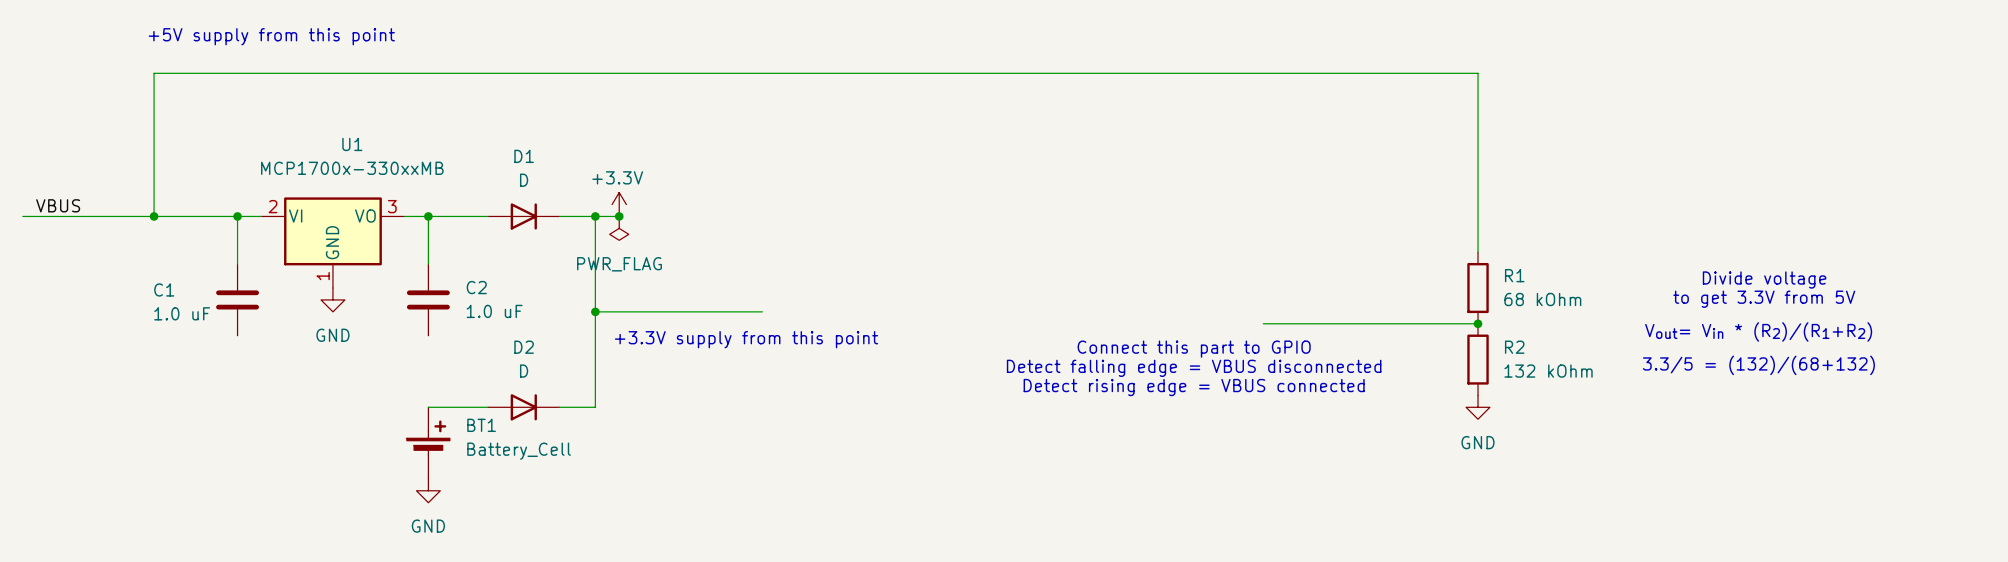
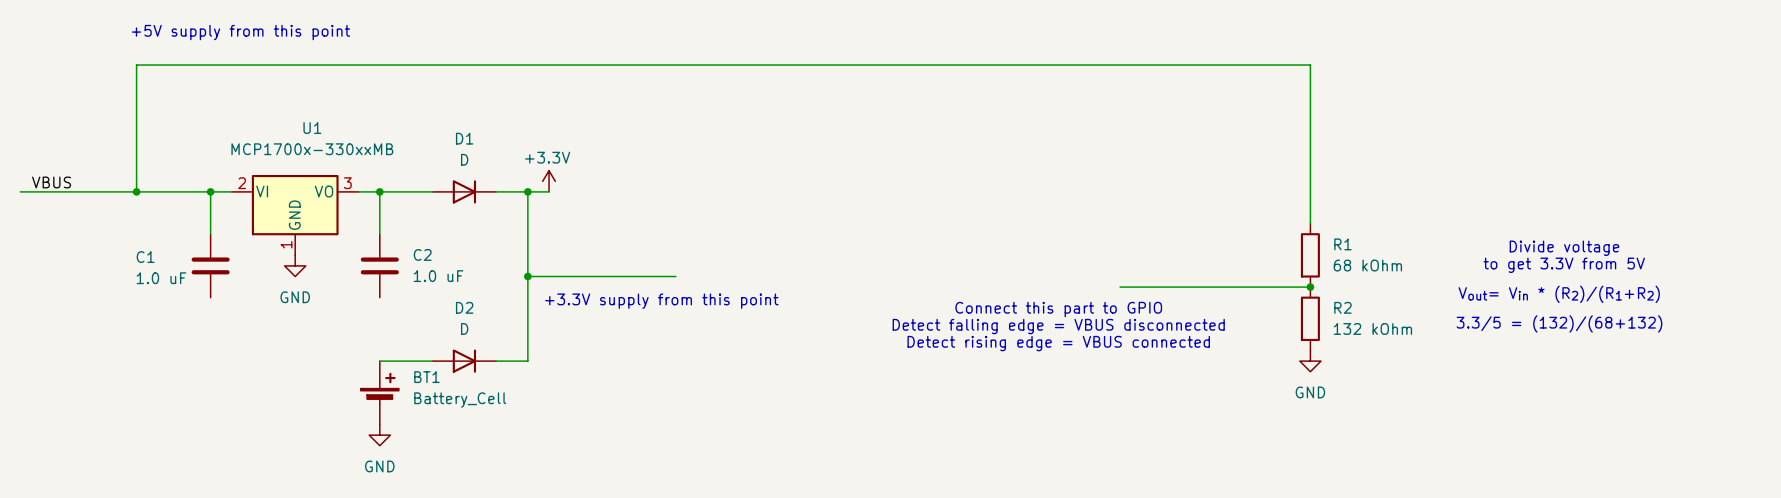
junction: (619, 216) -> none
power symbol: PWR_FLAG (619, 228) -> none

